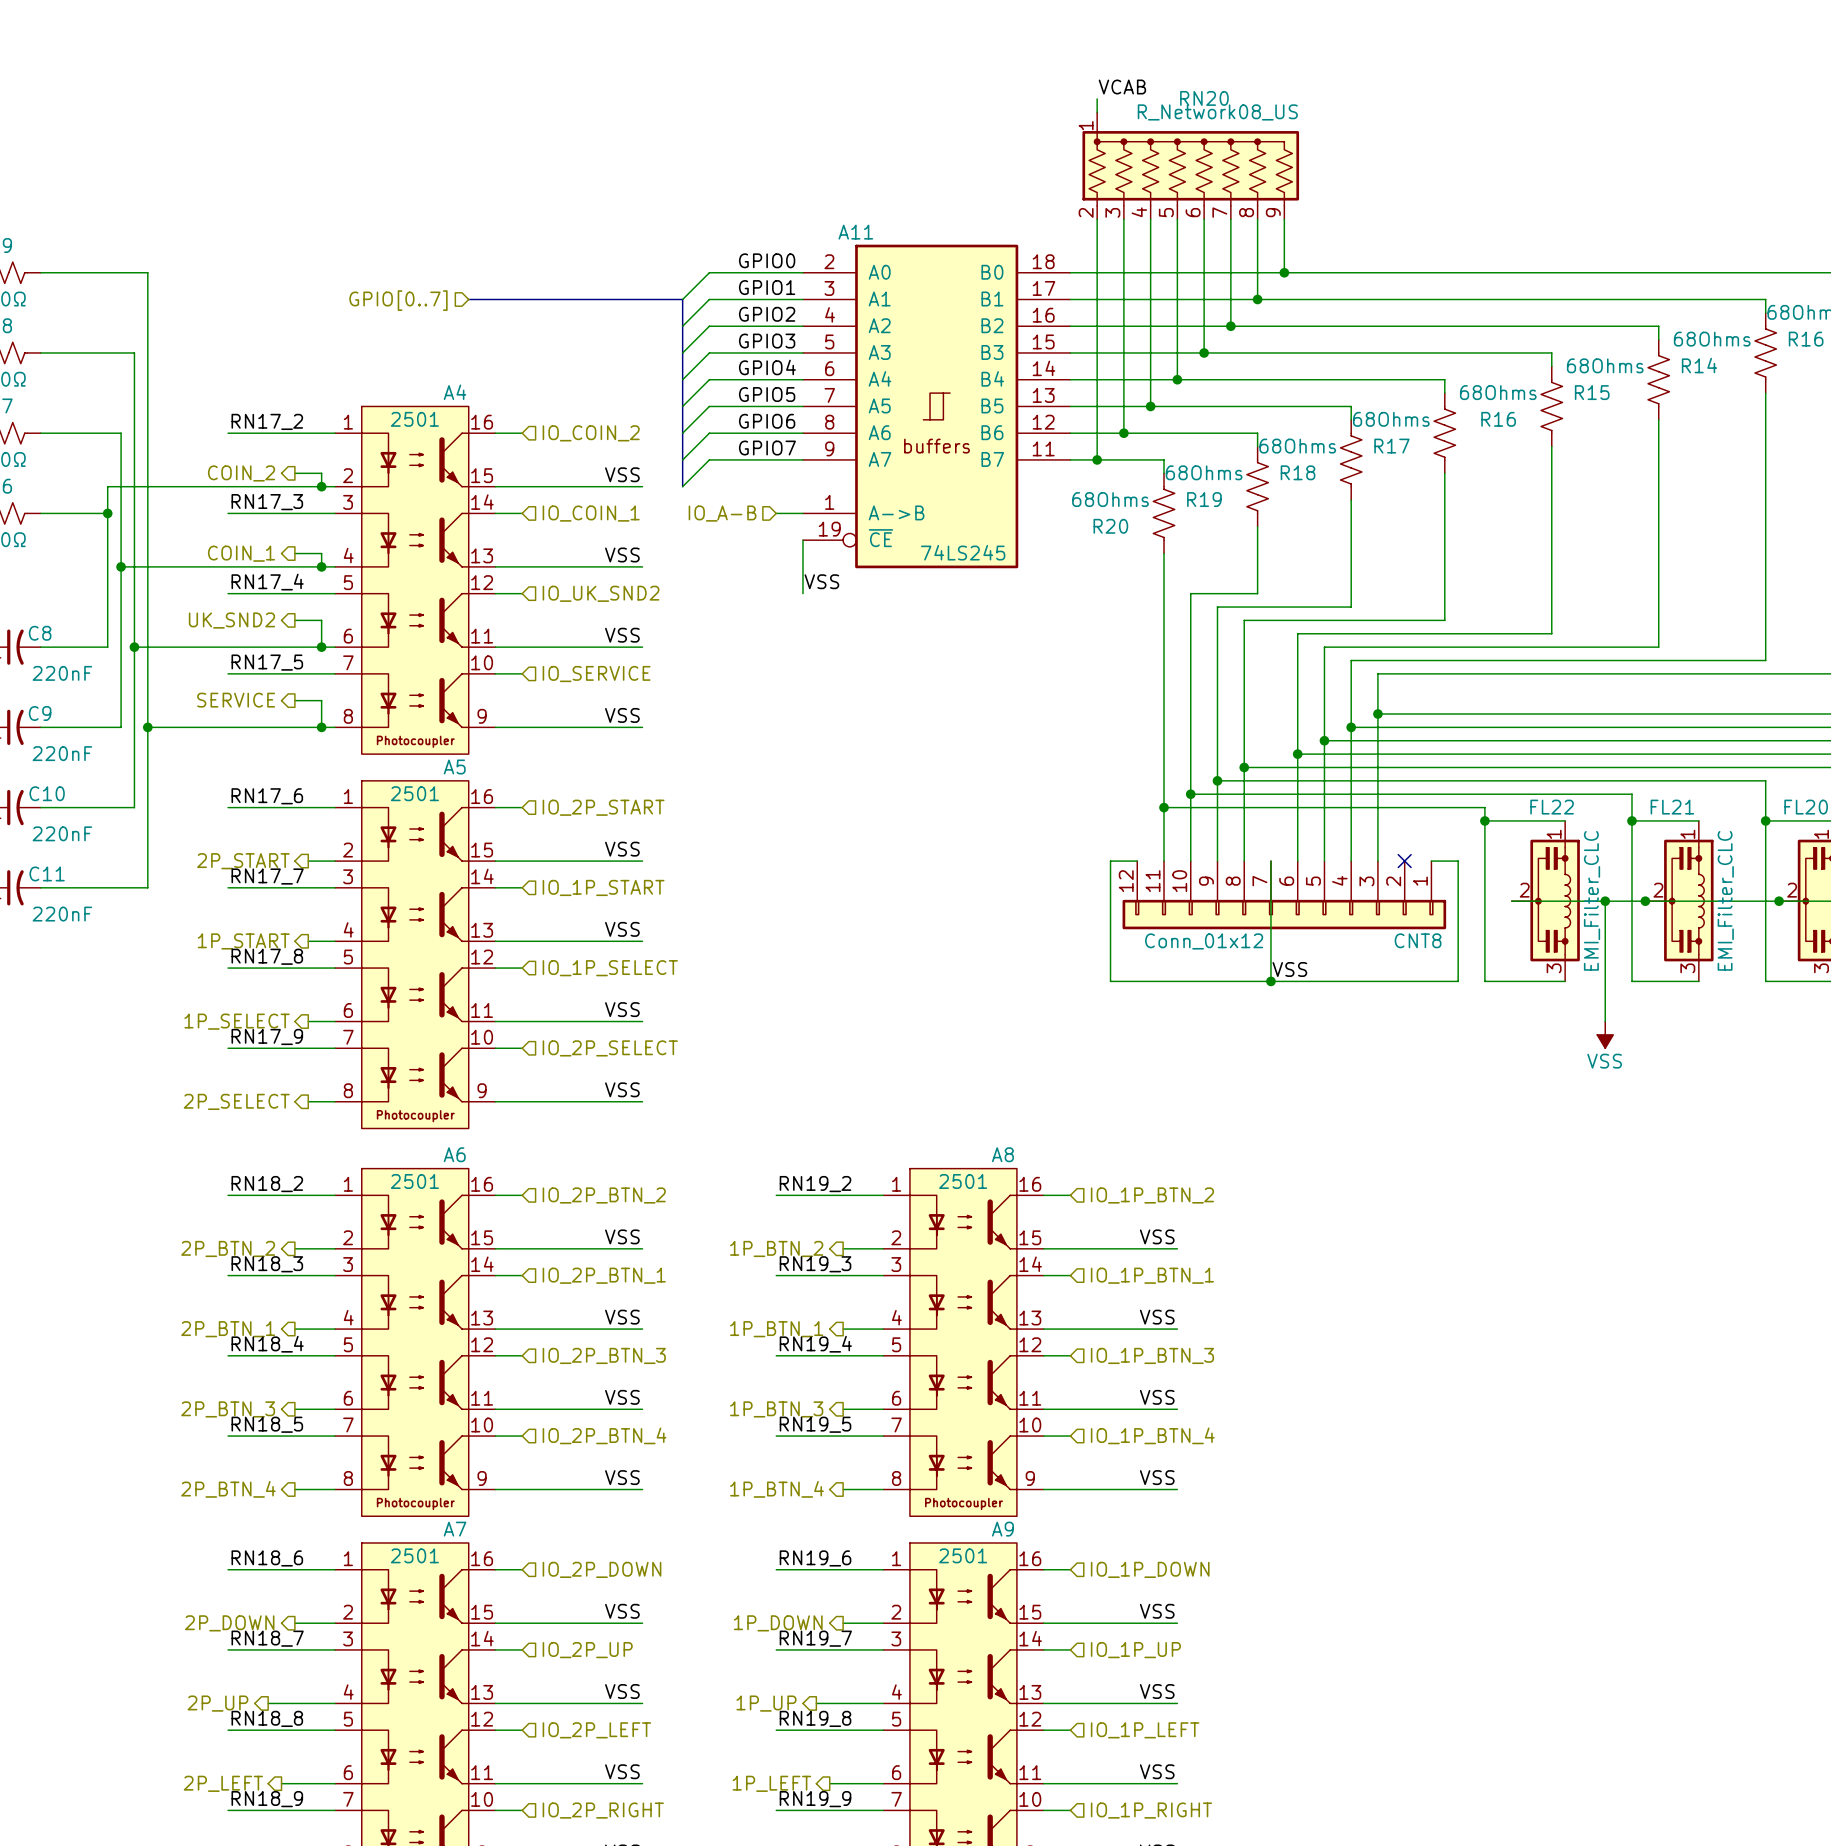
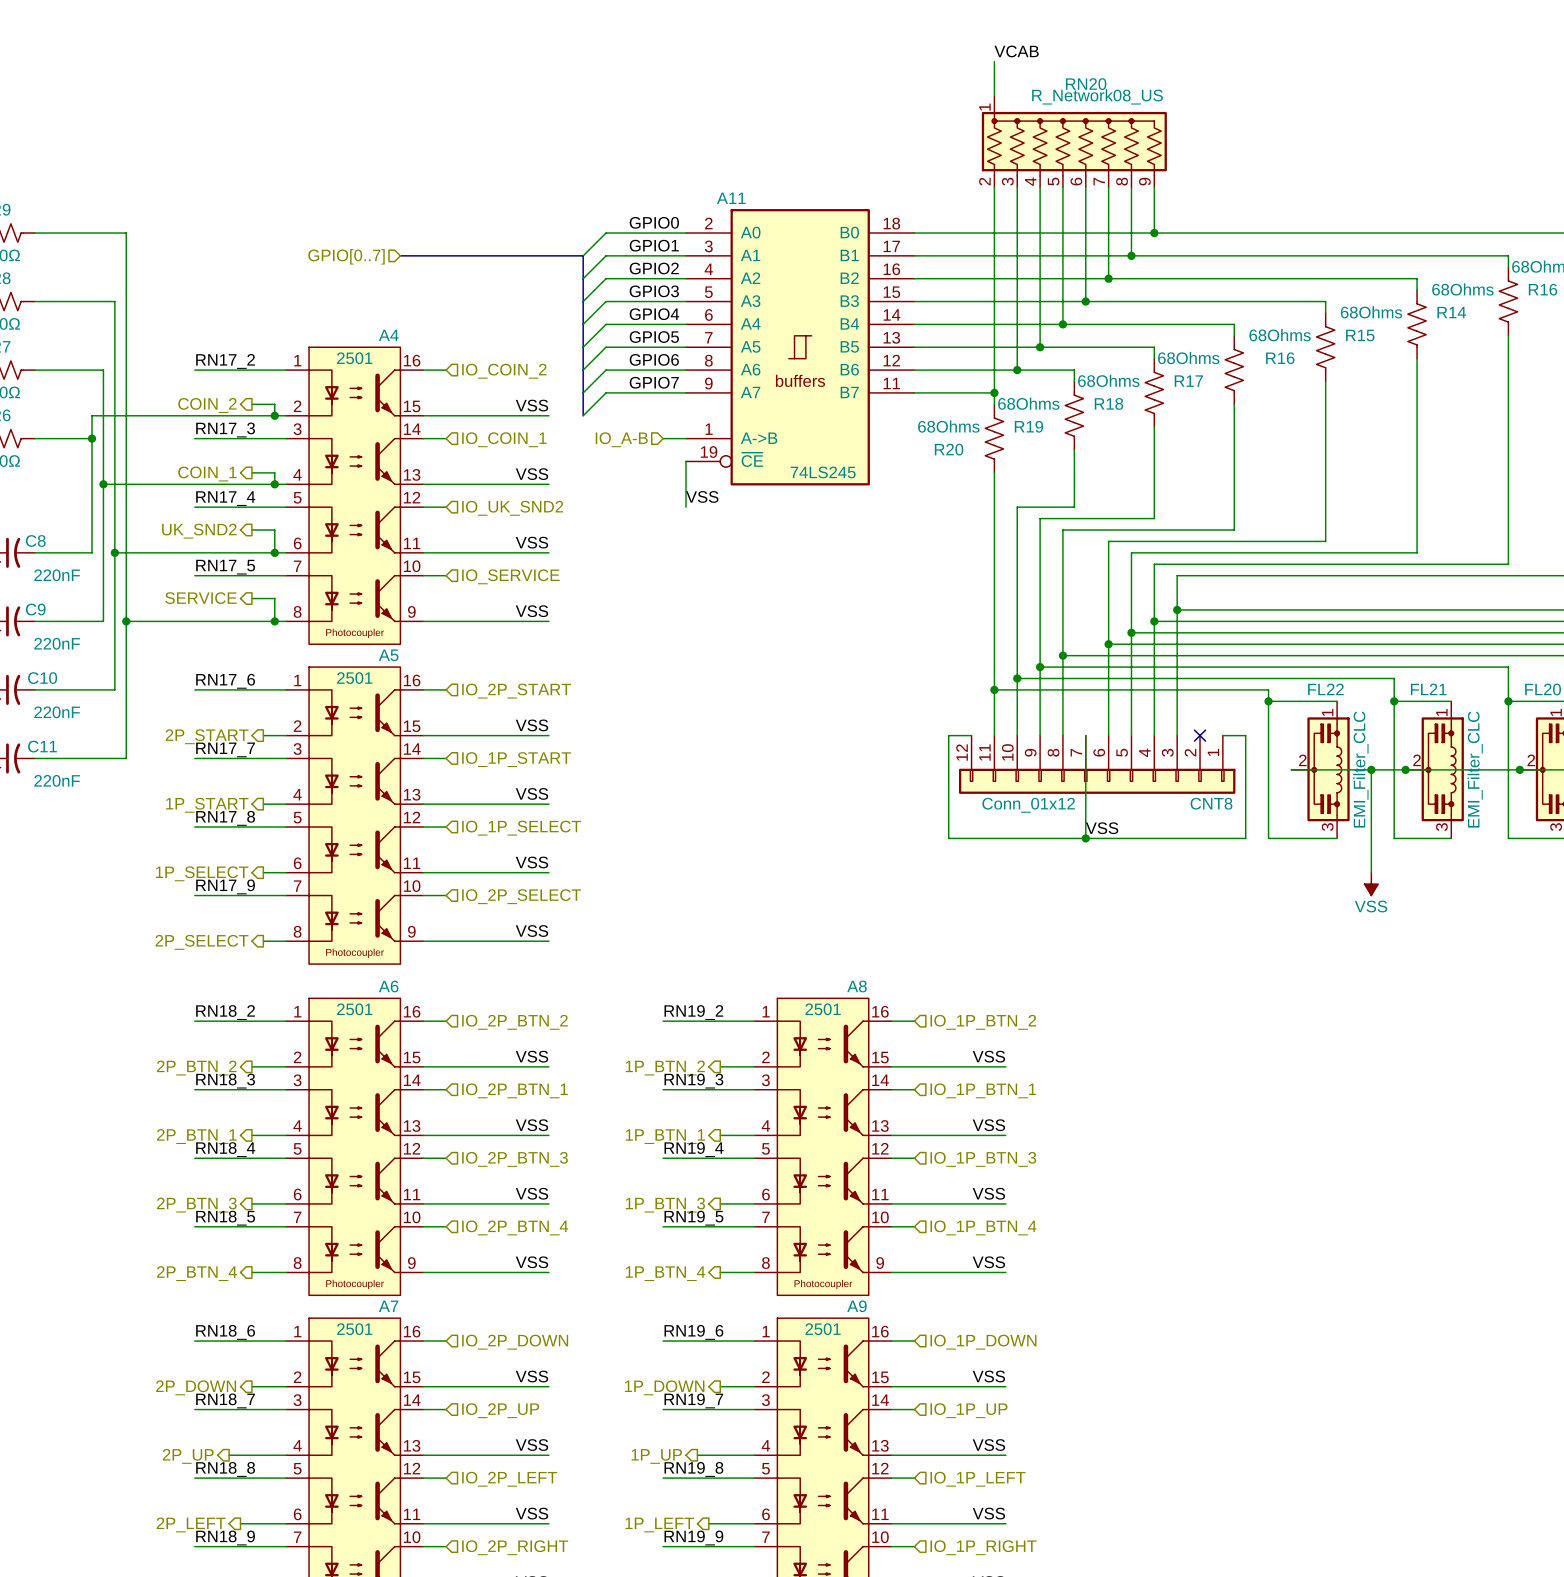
wire: none -> (994, 61) (994, 95)
label position: VCAB (1122, 87) -> VCAB (1016, 51)
wire: (1097, 98) (1097, 112) -> none
RN20 position: (1190, 165) -> (1074, 141)
wire: (1097, 219) (1097, 459) -> (994, 187) (994, 392)
wire: (1123, 219) (1123, 433) -> (1017, 187) (1017, 370)
wire: (1150, 219) (1150, 406) -> (1040, 187) (1040, 347)
wire: (1177, 219) (1177, 379) -> (1062, 187) (1062, 324)
wire: (1204, 219) (1204, 352) -> (1085, 187) (1085, 301)
wire: (1230, 219) (1230, 326) -> (1108, 187) (1108, 278)
wire: (1257, 219) (1257, 299) -> (1131, 187) (1131, 255)
wire: (1284, 219) (1284, 272) -> (1154, 187) (1154, 233)
junction: (1284, 272) -> none
junction: none -> (1154, 233)
junction: (1257, 299) -> none
junction: none -> (1131, 255)
junction: (1230, 326) -> none
junction: none -> (1108, 278)
junction: (1204, 352) -> none
junction: none -> (1085, 301)
junction: (1177, 379) -> none
junction: none -> (1062, 324)
junction: (1150, 406) -> none
junction: none -> (1040, 347)
junction: (1123, 433) -> none
junction: none -> (1017, 370)
junction: (1097, 459) -> none
junction: none -> (994, 392)

